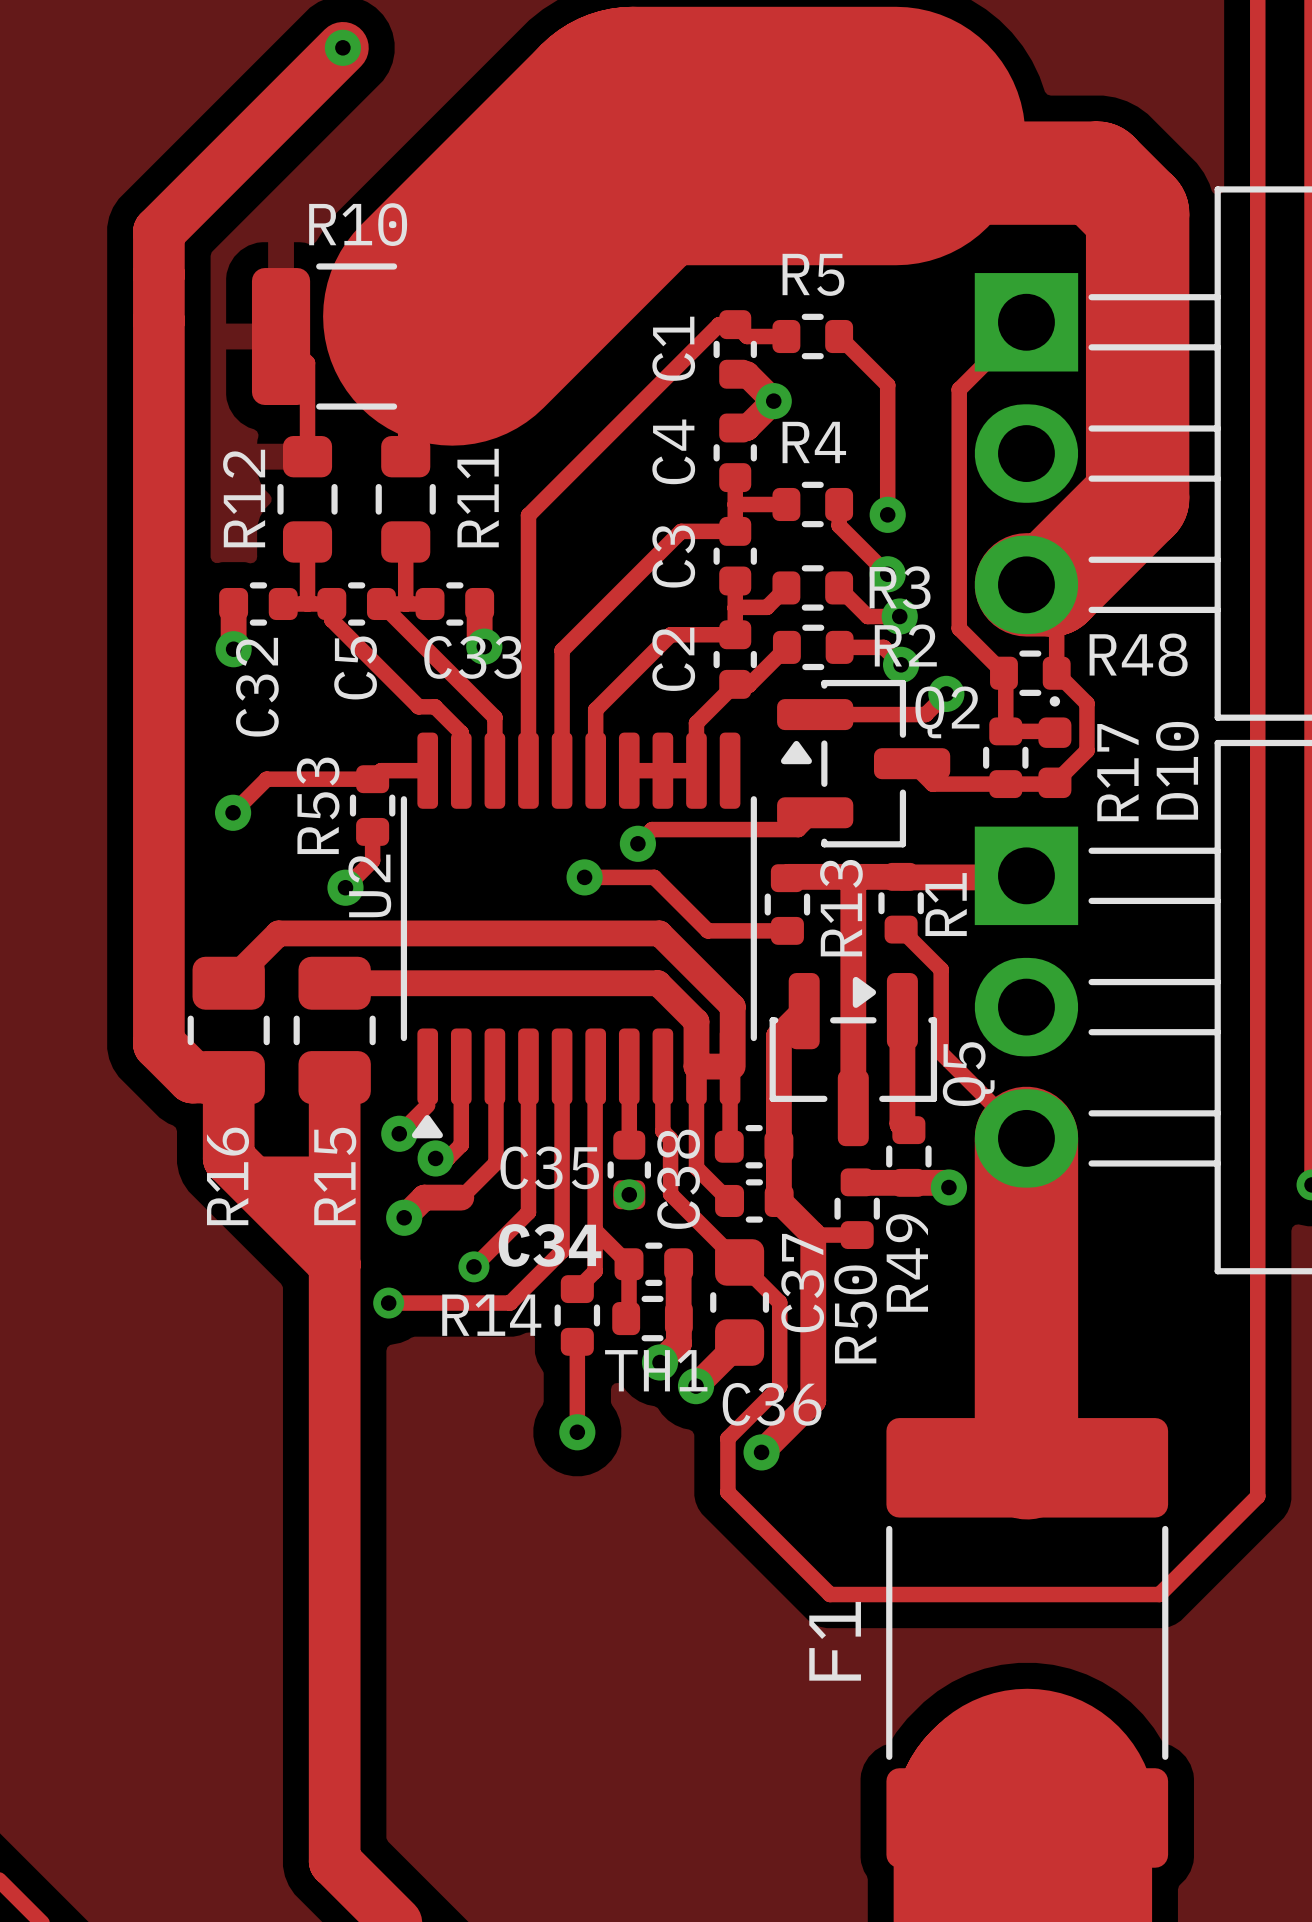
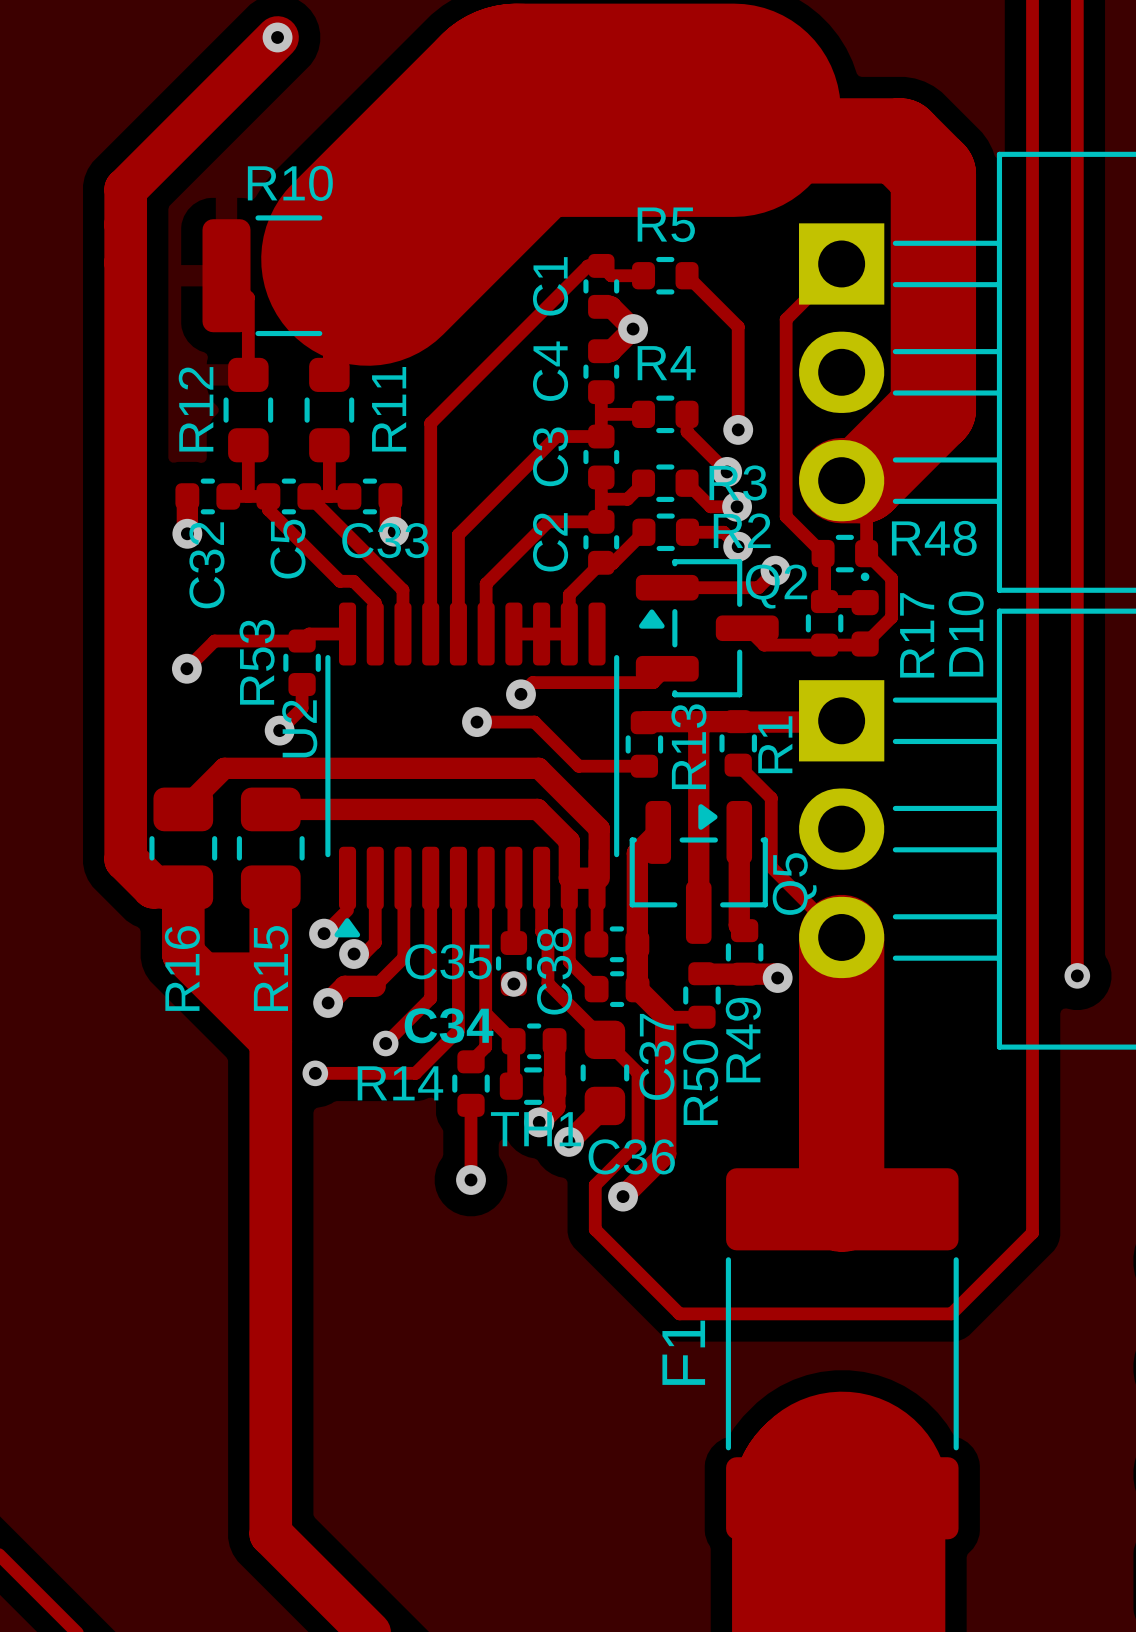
track: (887, 385) (887, 514) -> (727, 315) (738, 326) (738, 429)
via position: (887, 514) -> (738, 429)

